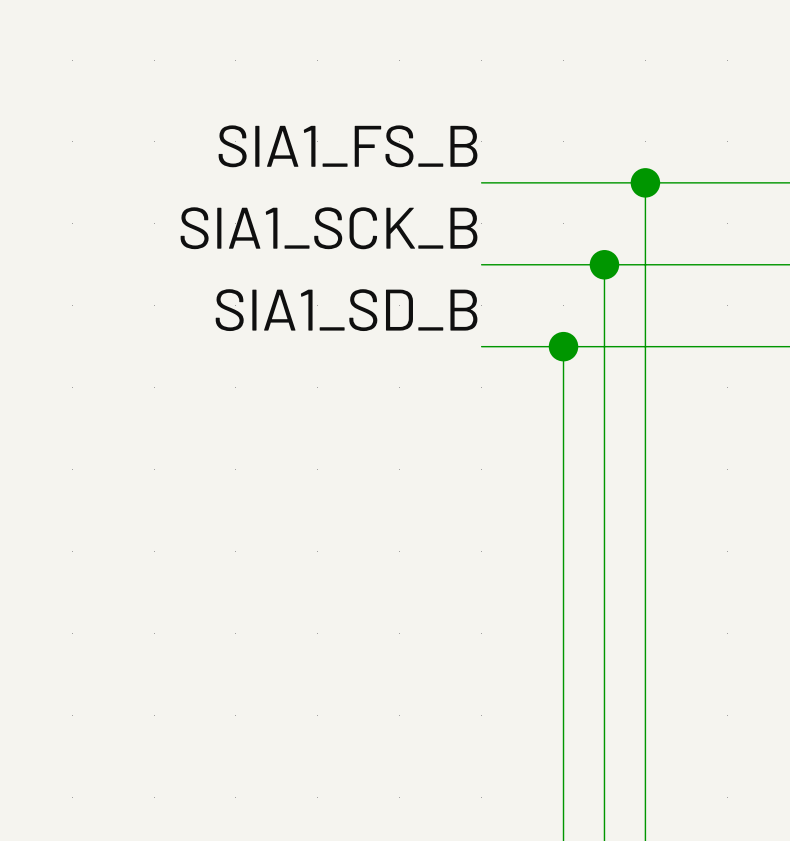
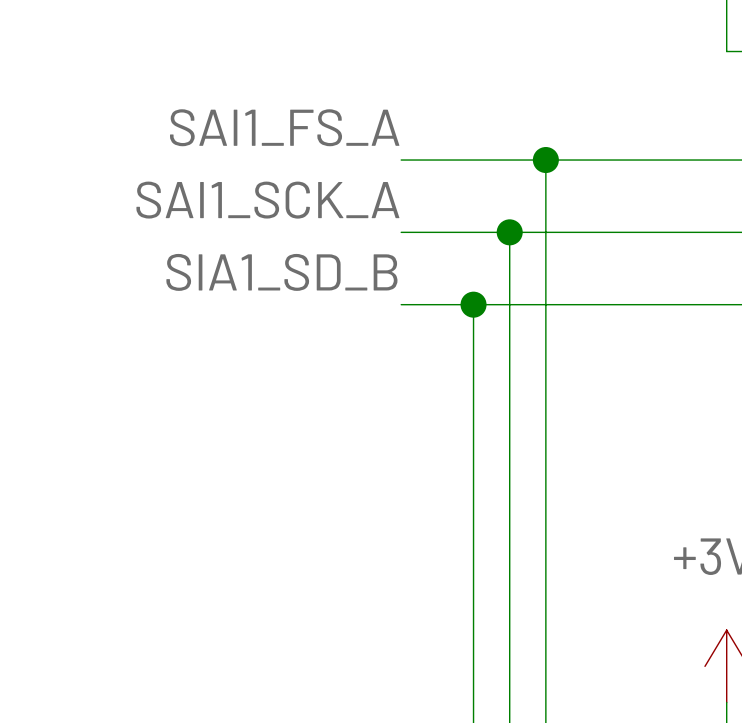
label: SIA1_FS_B (348, 146) -> SAI1_FS_A (284, 127)
label: SIA1_SCK_B (329, 228) -> SAI1_SCK_A (267, 200)

